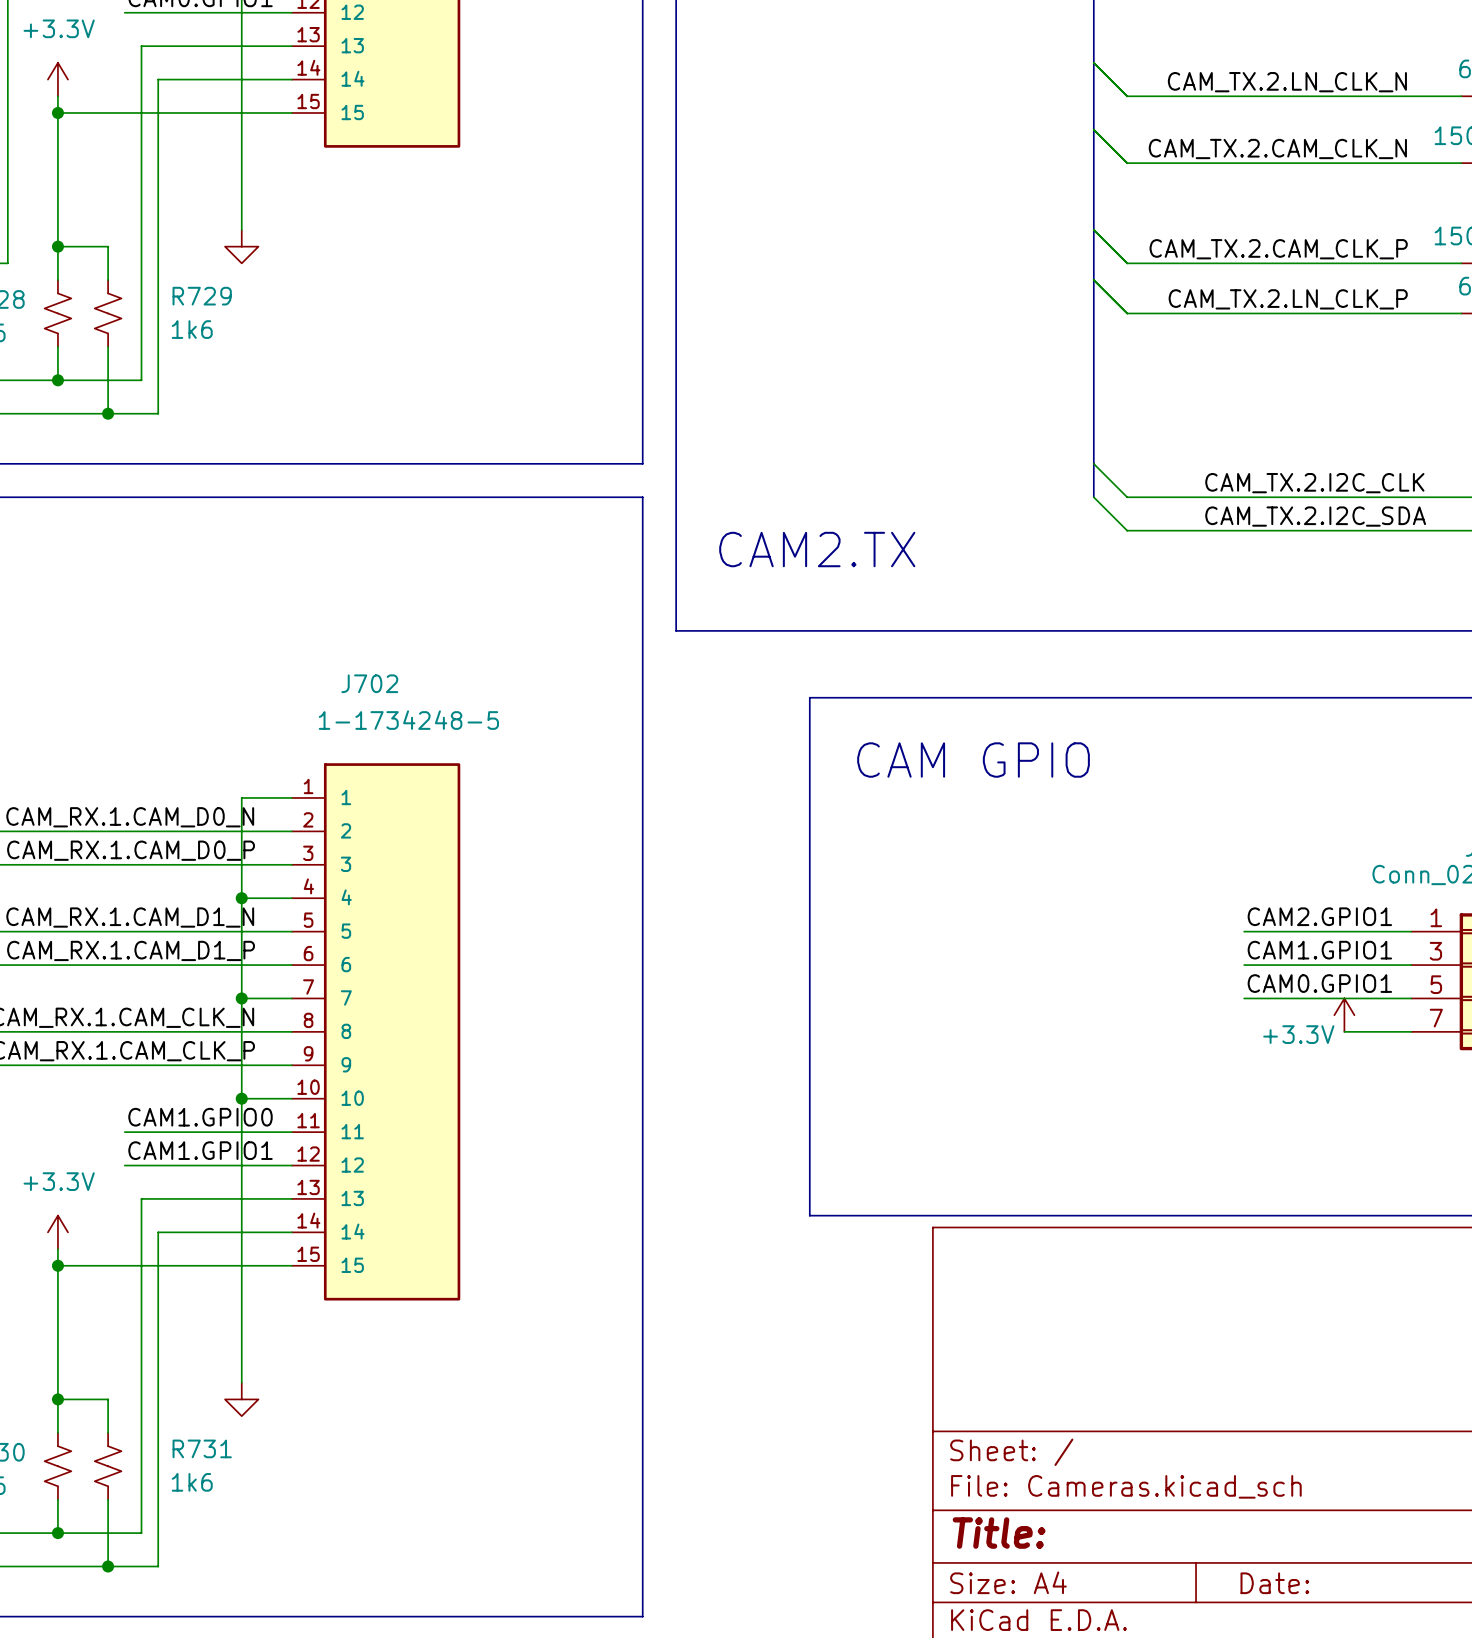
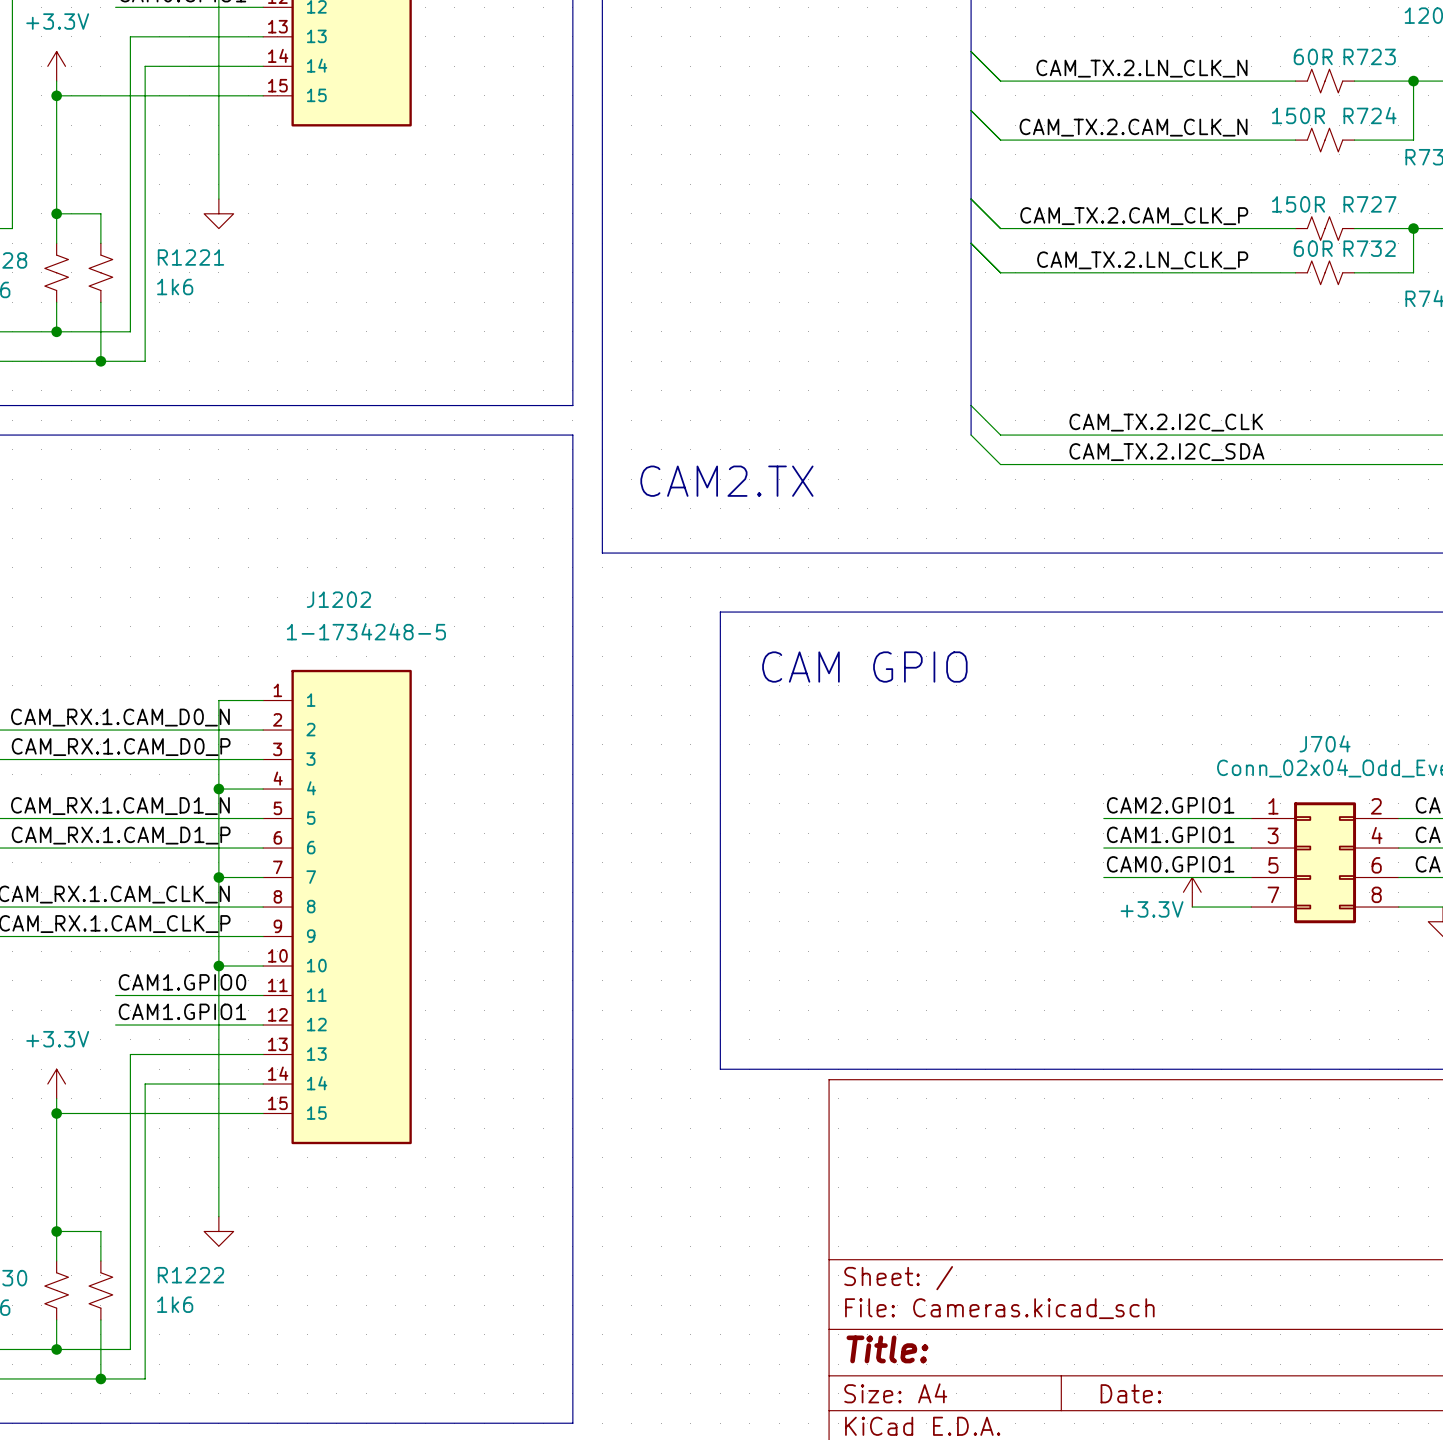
R729 name: R729 (202, 296) -> R1221 (190, 257)
J702 name: J702 (369, 683) -> J1202 (338, 599)
R731 name: R731 (202, 1448) -> R1222 (190, 1275)

